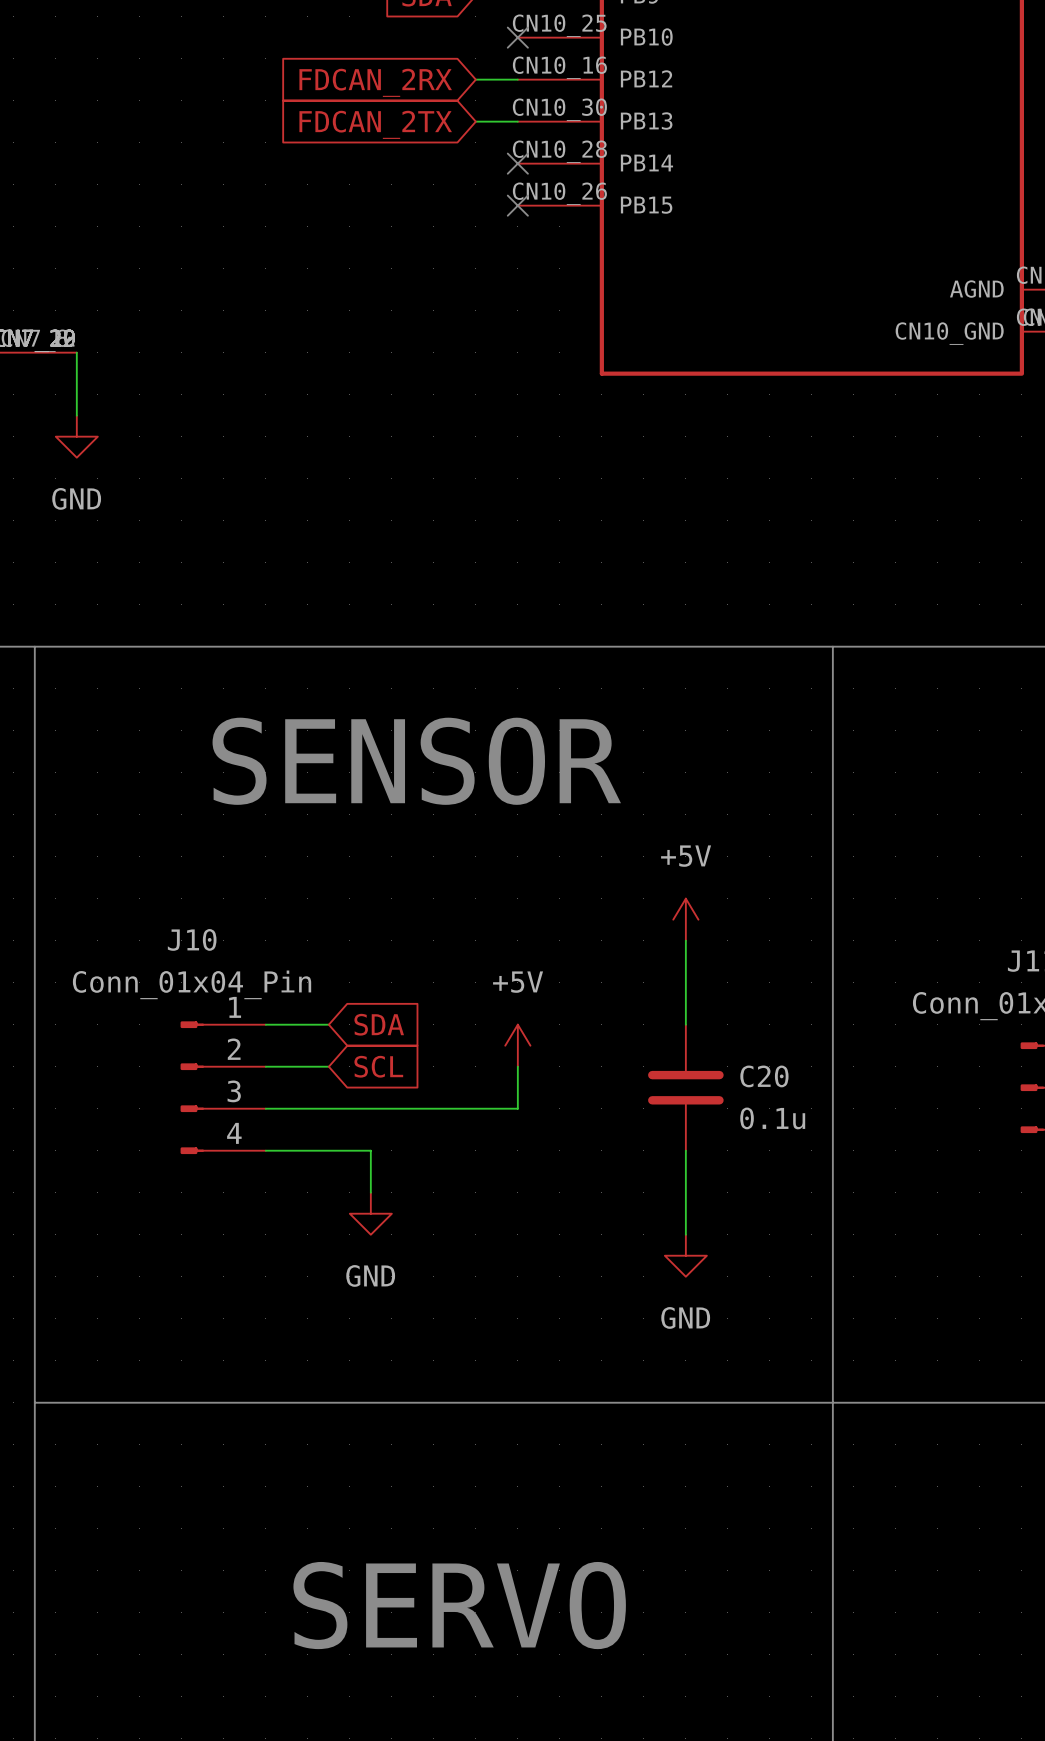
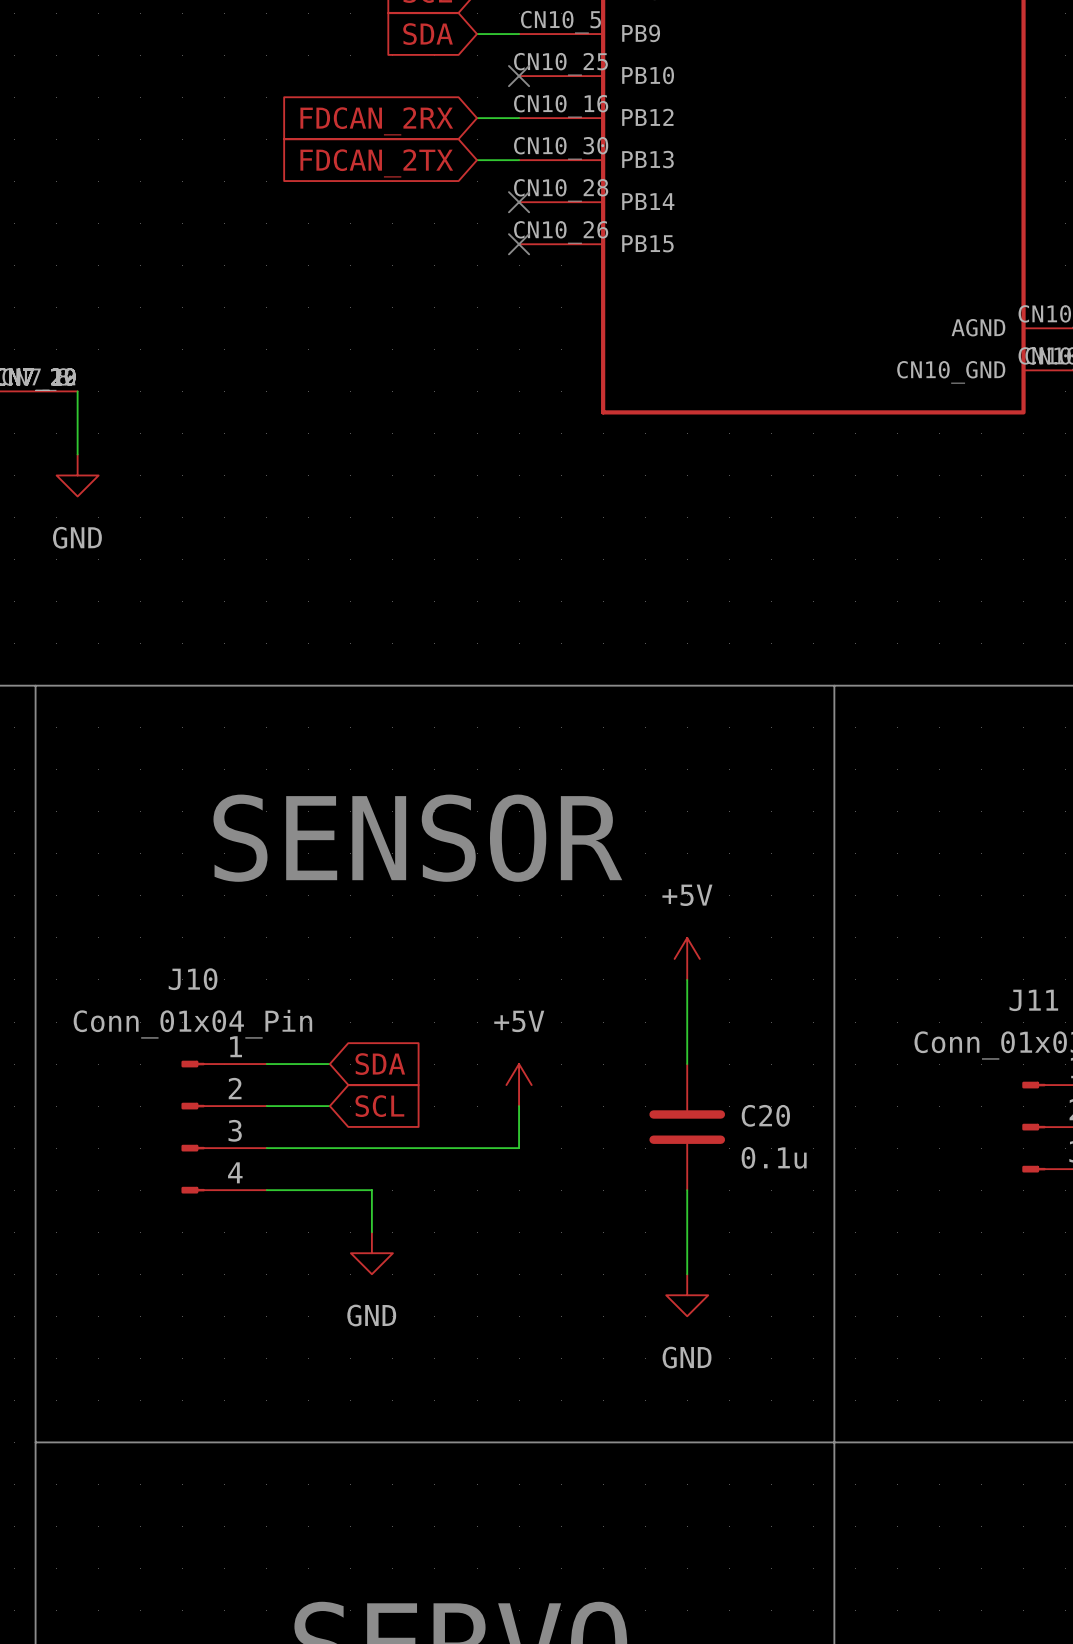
text position: SENSOR (416, 761) -> SENSOR (417, 838)

